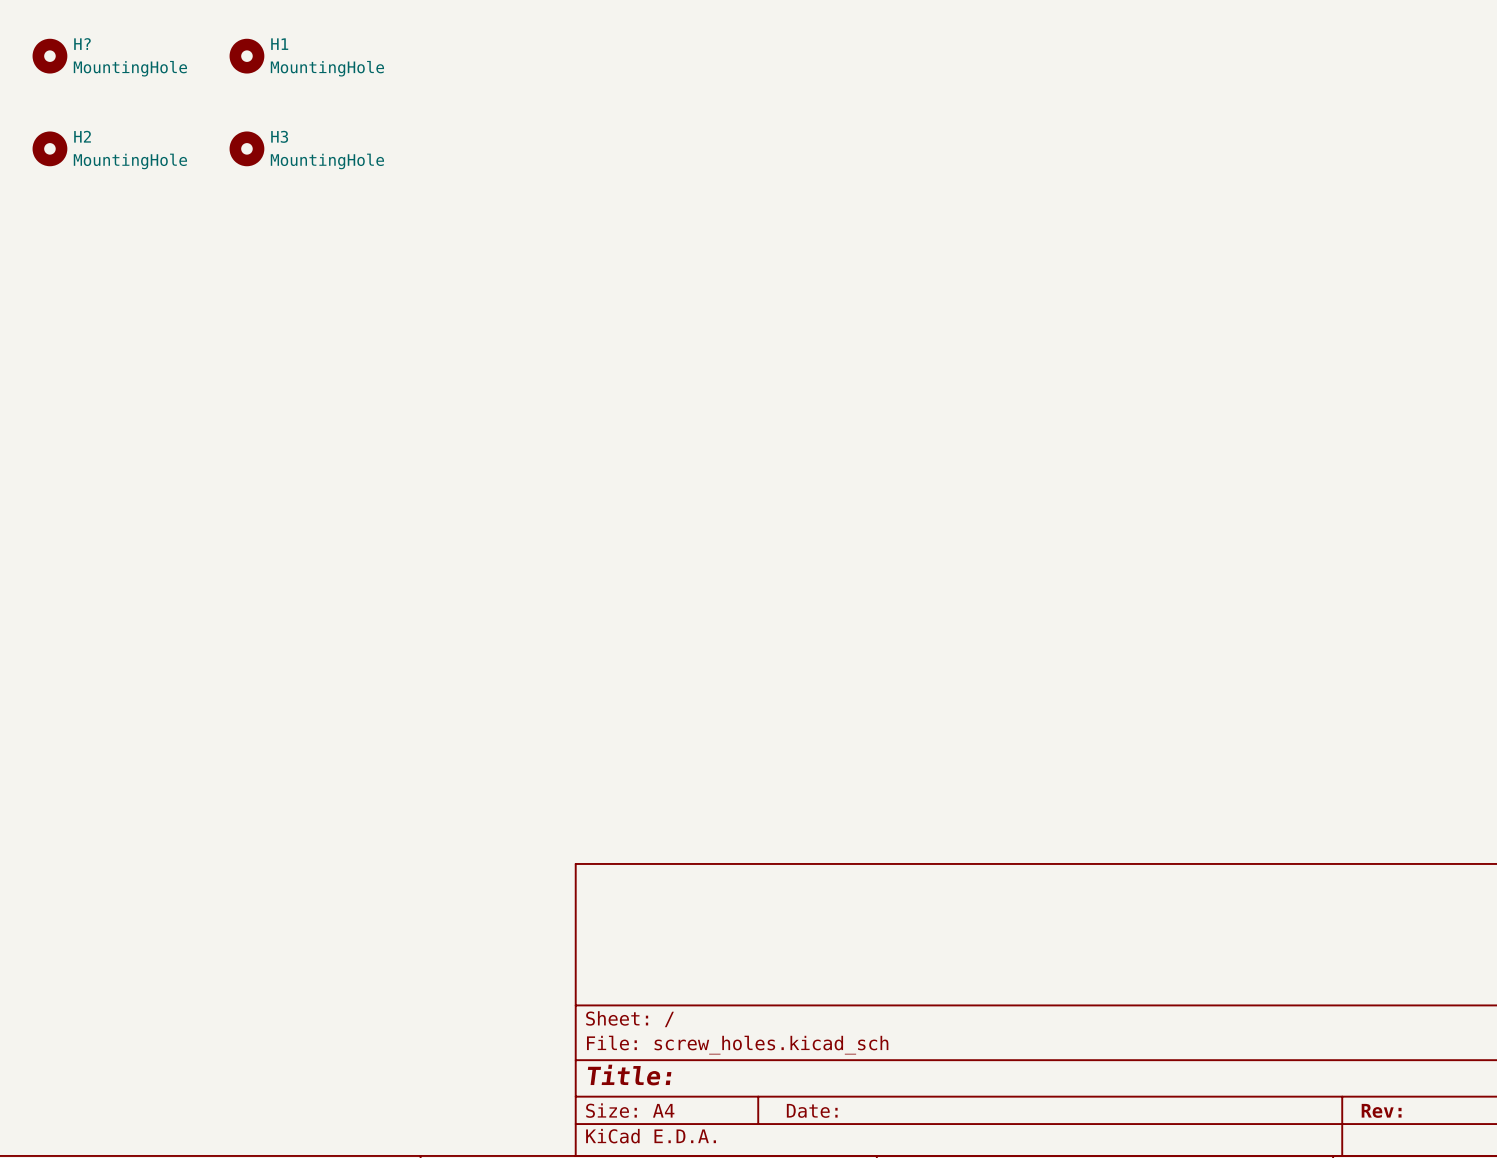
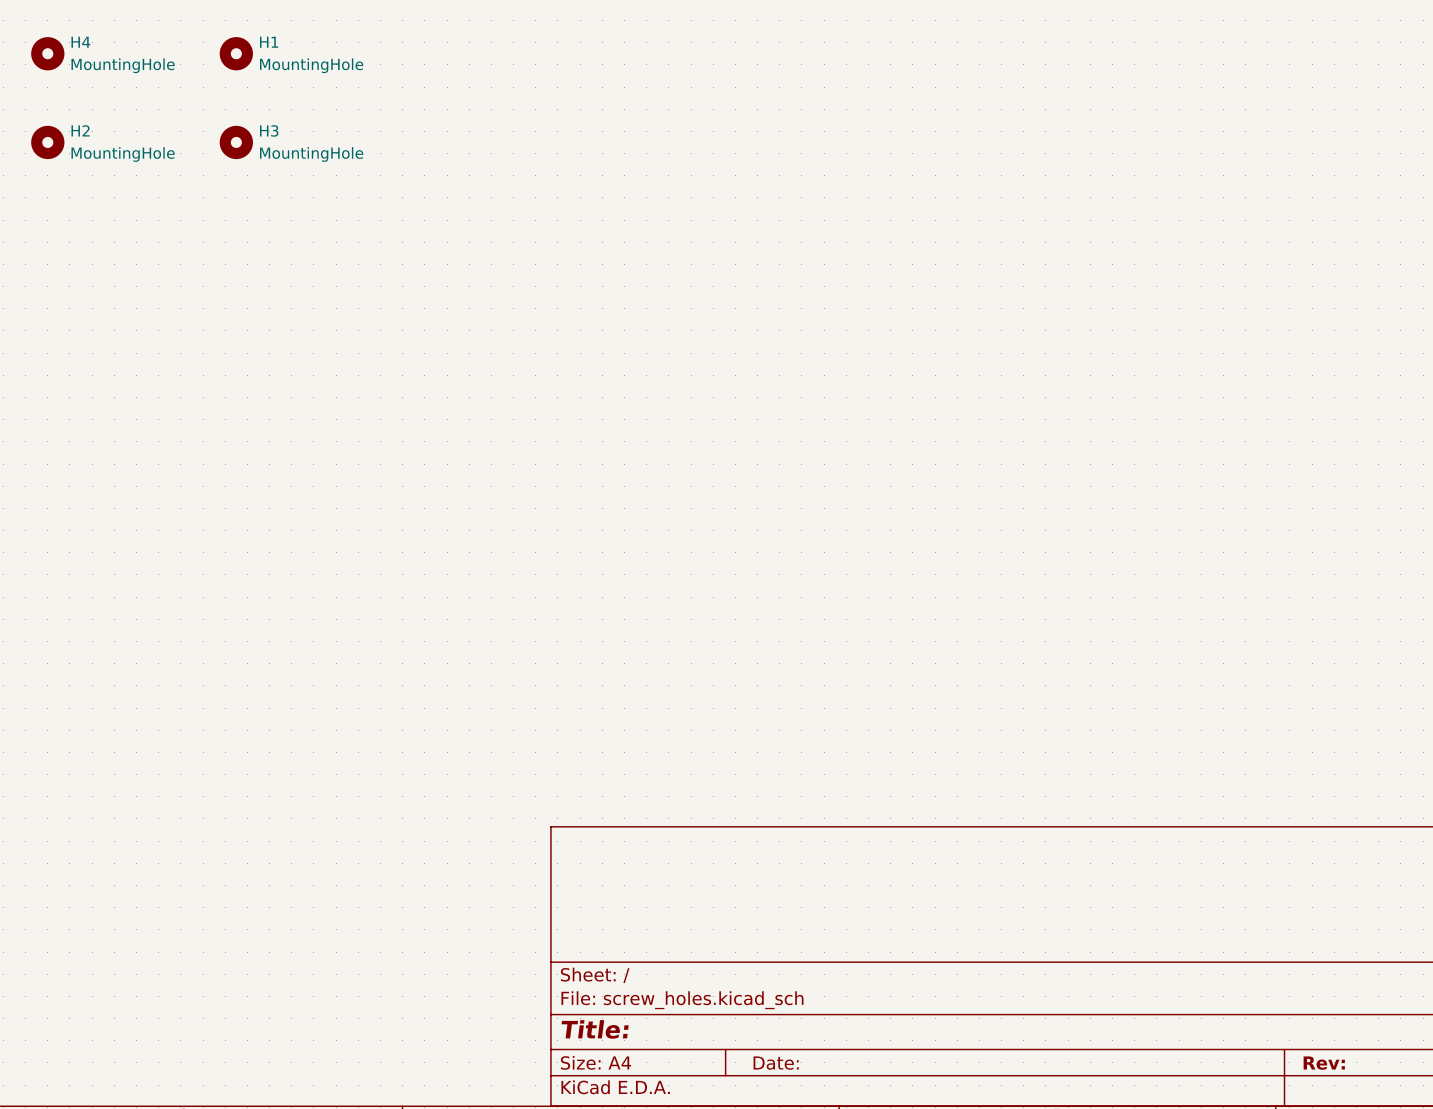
H? name: H? (82, 44) -> H4 (80, 42)

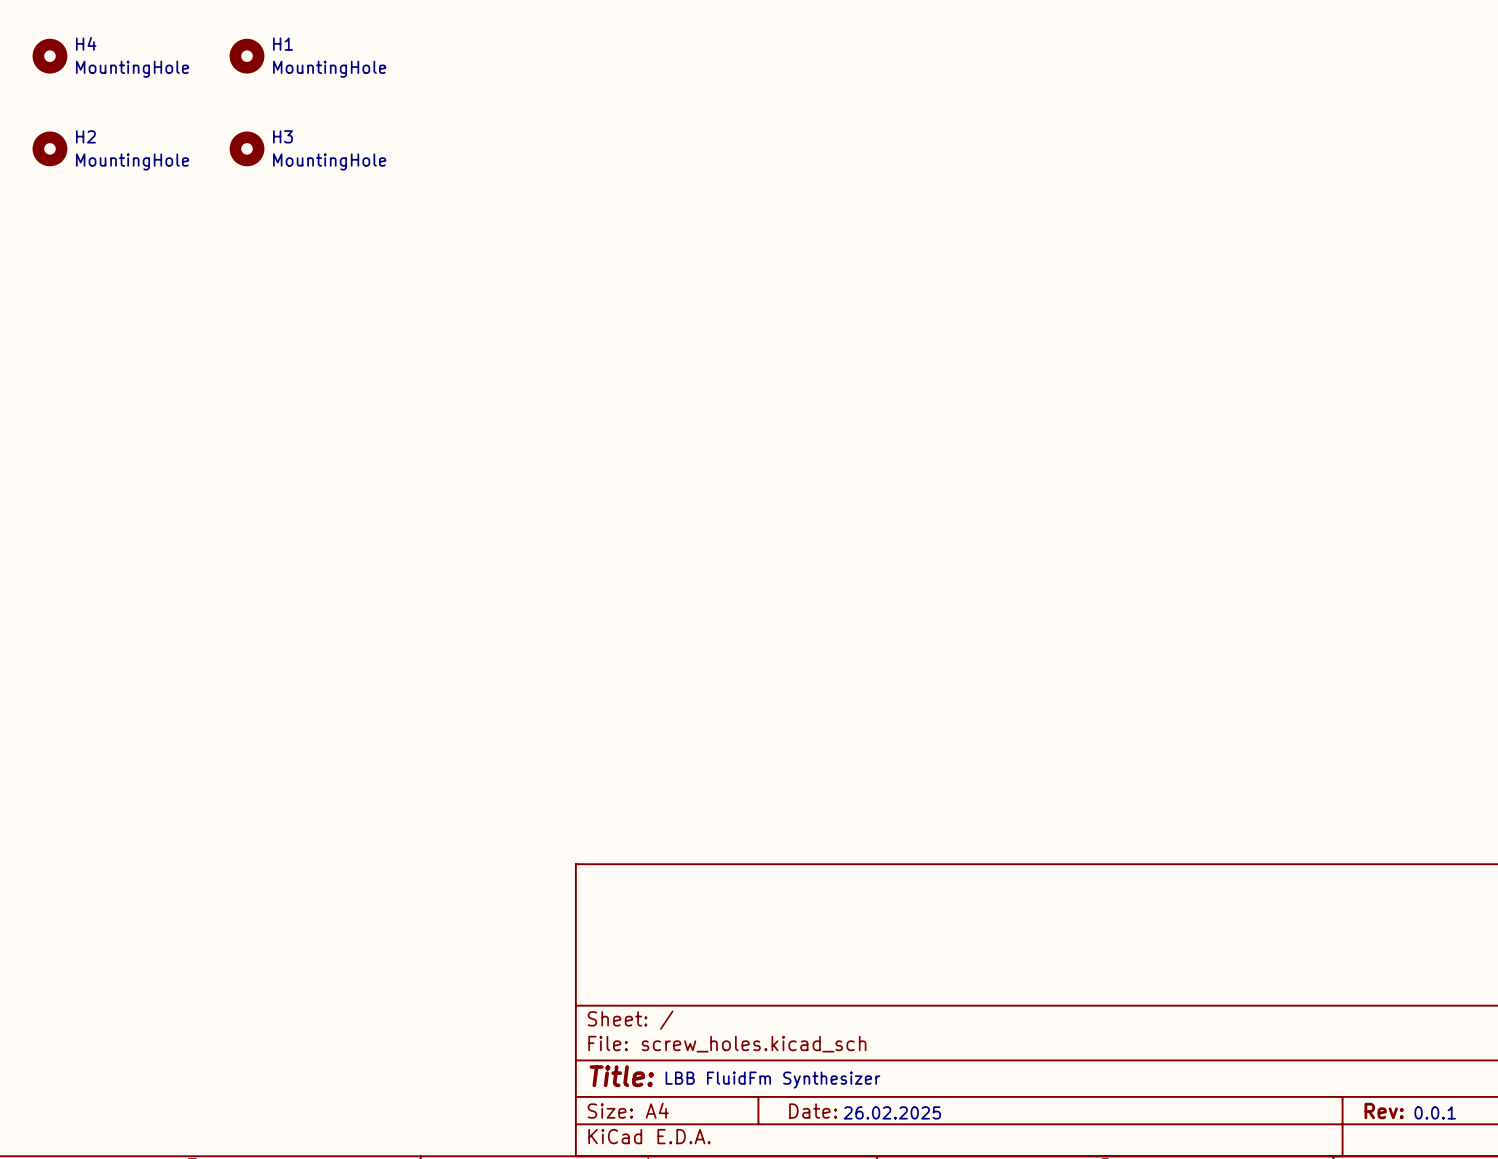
text: none -> LBB FluidFm Synthesizer (772, 1080)
text: none -> 26.02.2025 (892, 1112)
text: none -> 0.0.1 (1435, 1112)

